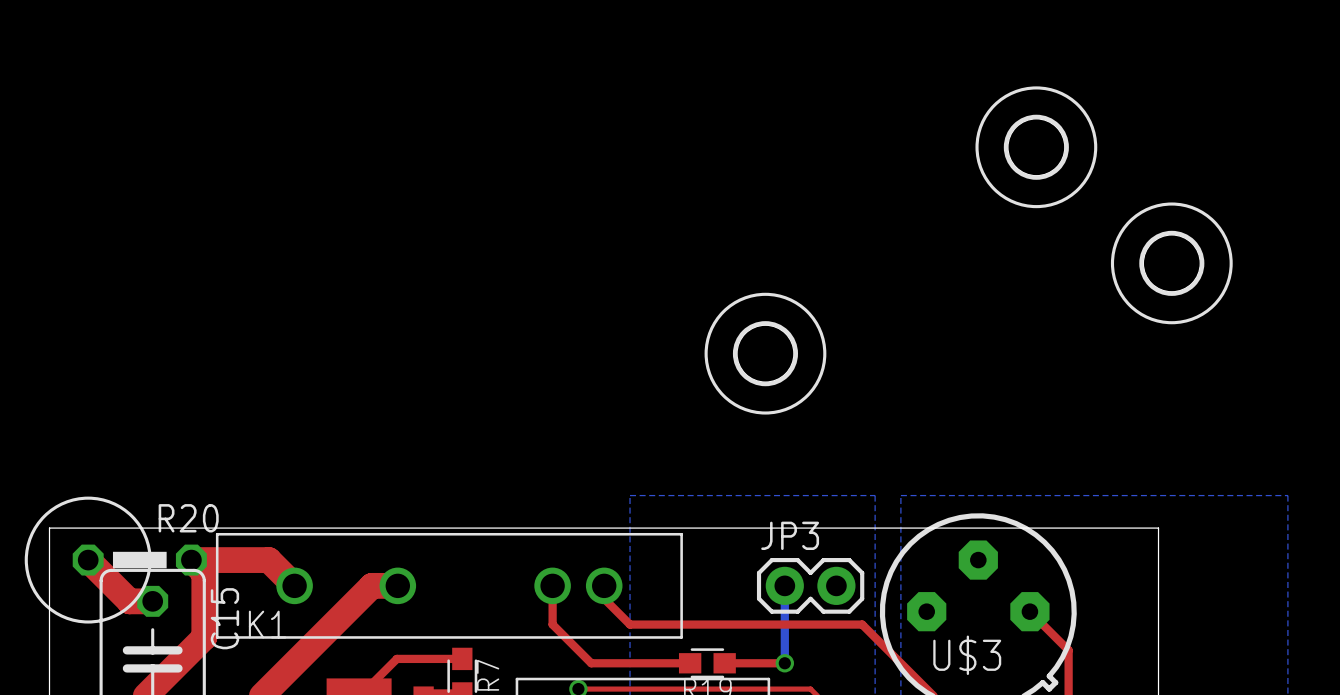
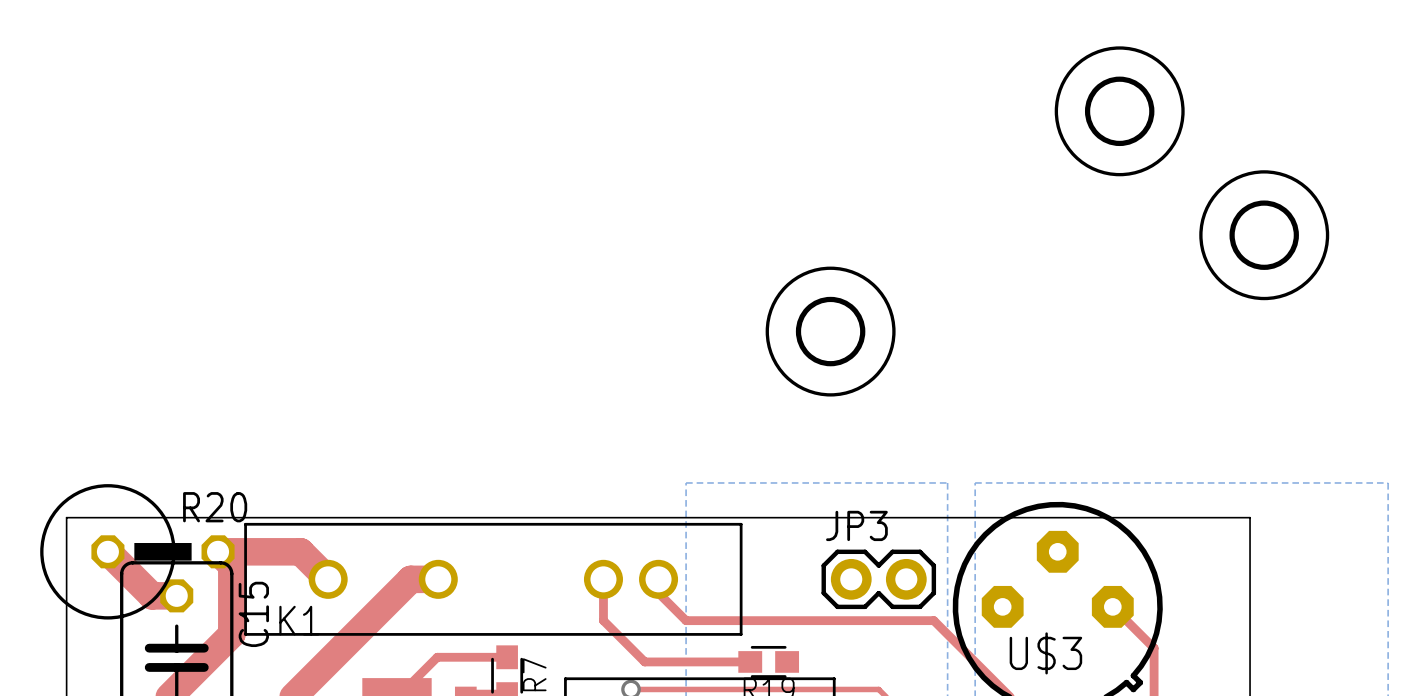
bottom track: (784, 585) (784, 663) -> none
top track: (724, 663) (784, 663) -> none
via: (784, 663) -> none

